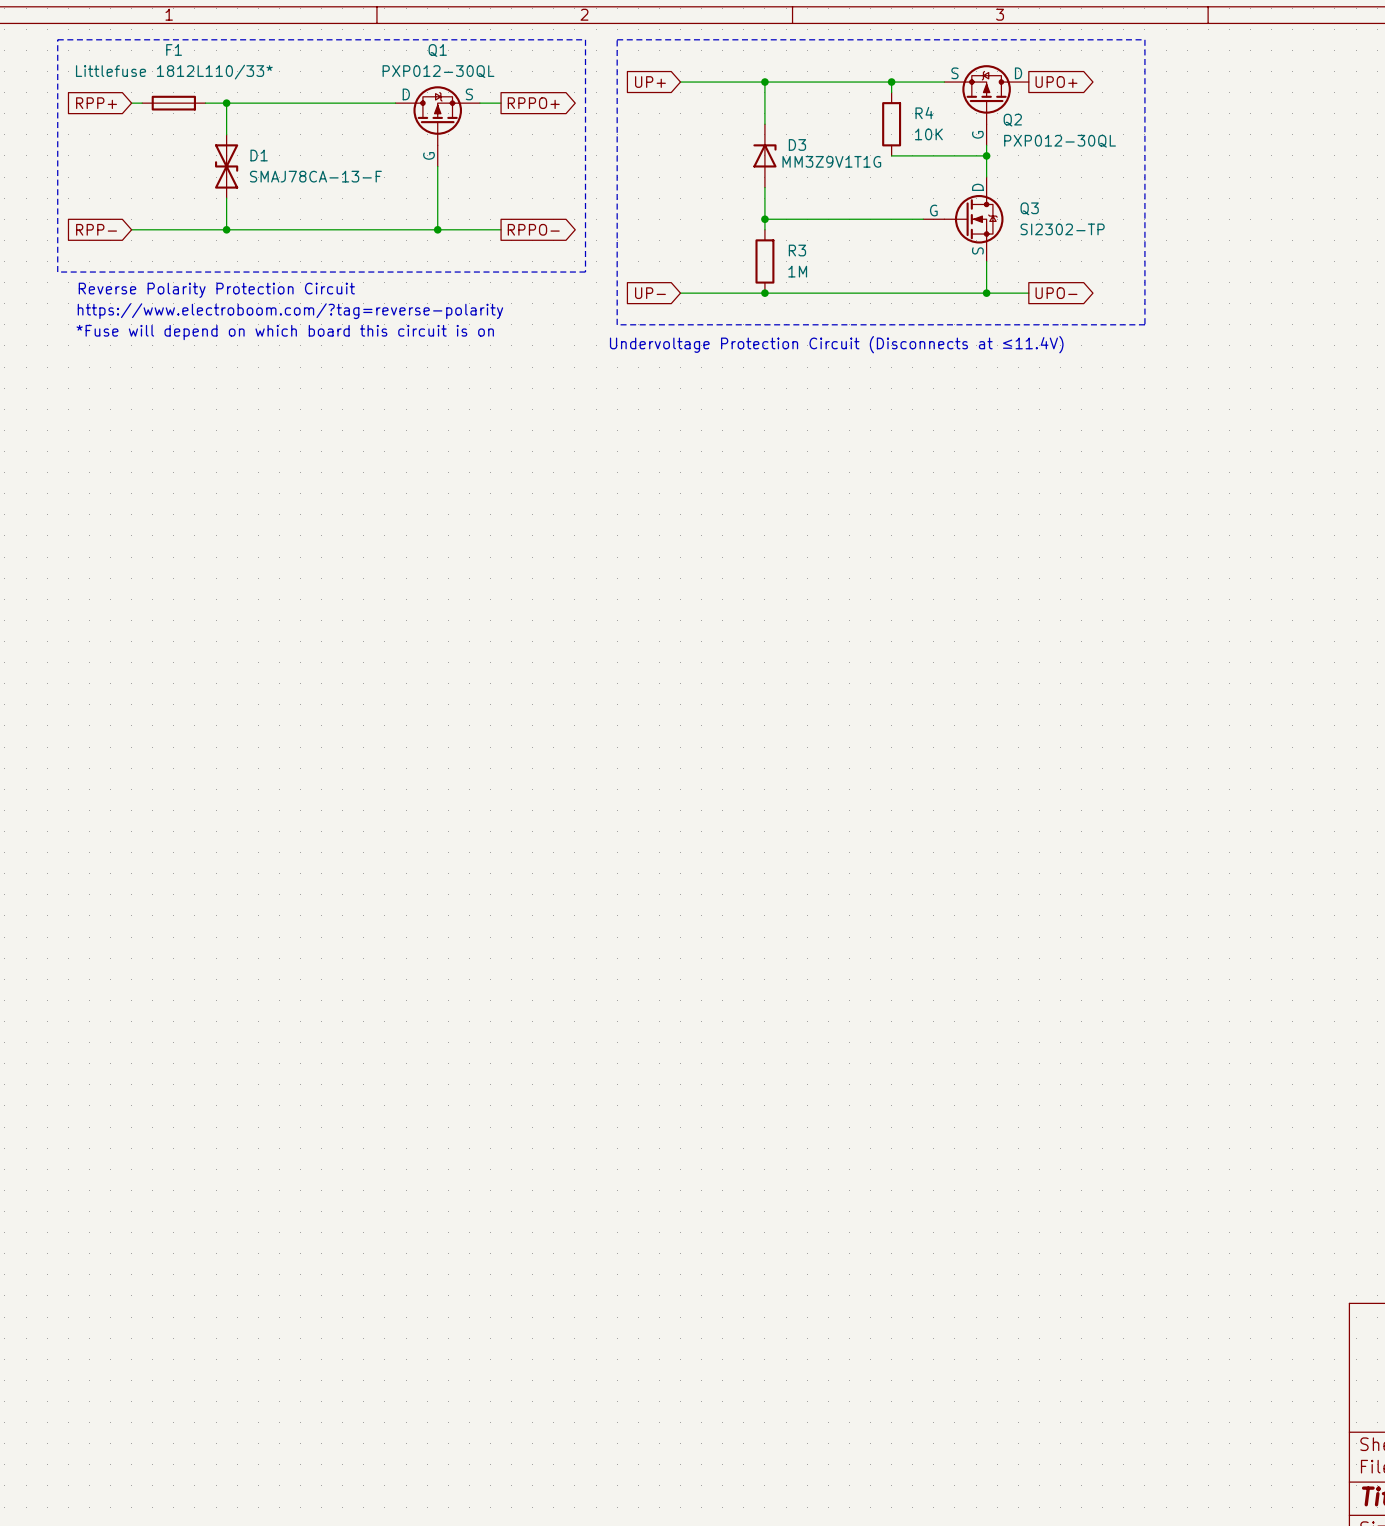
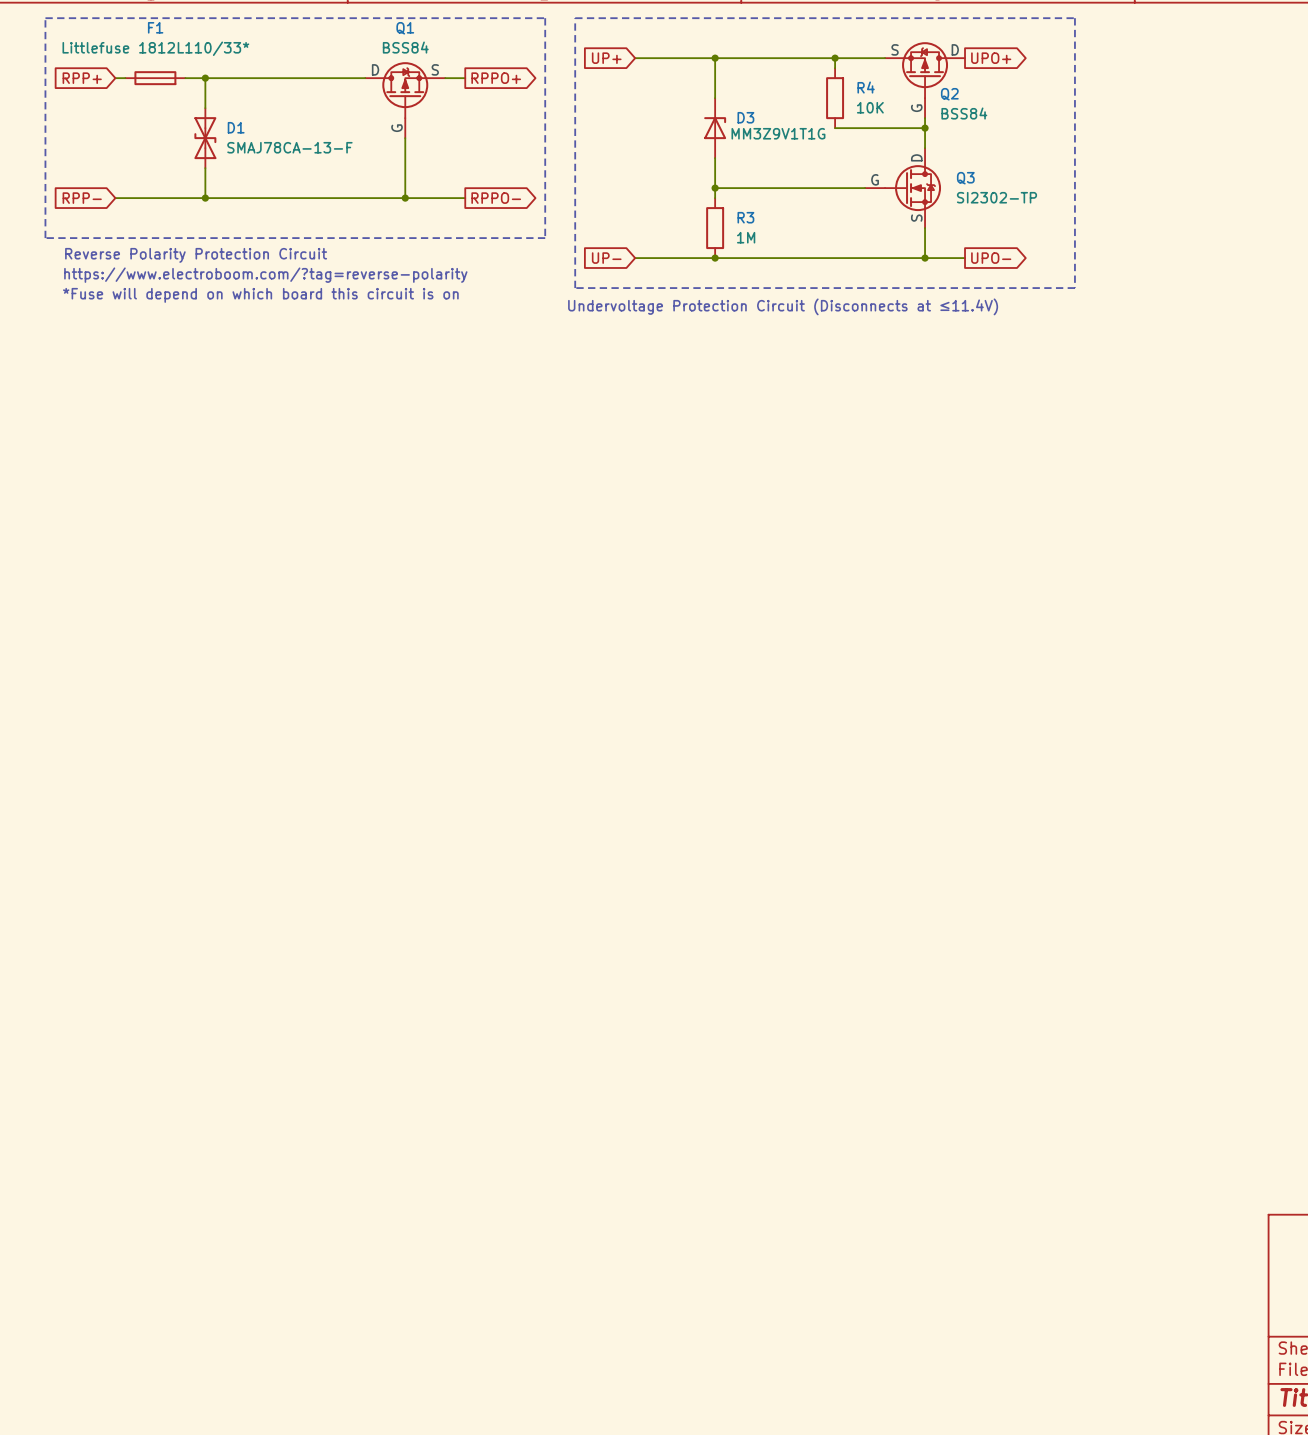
Q1 value: PXP012-30QL (438, 71) -> BSS84 (405, 47)
Q2 value: PXP012-30QL (1060, 141) -> BSS84 (964, 113)

